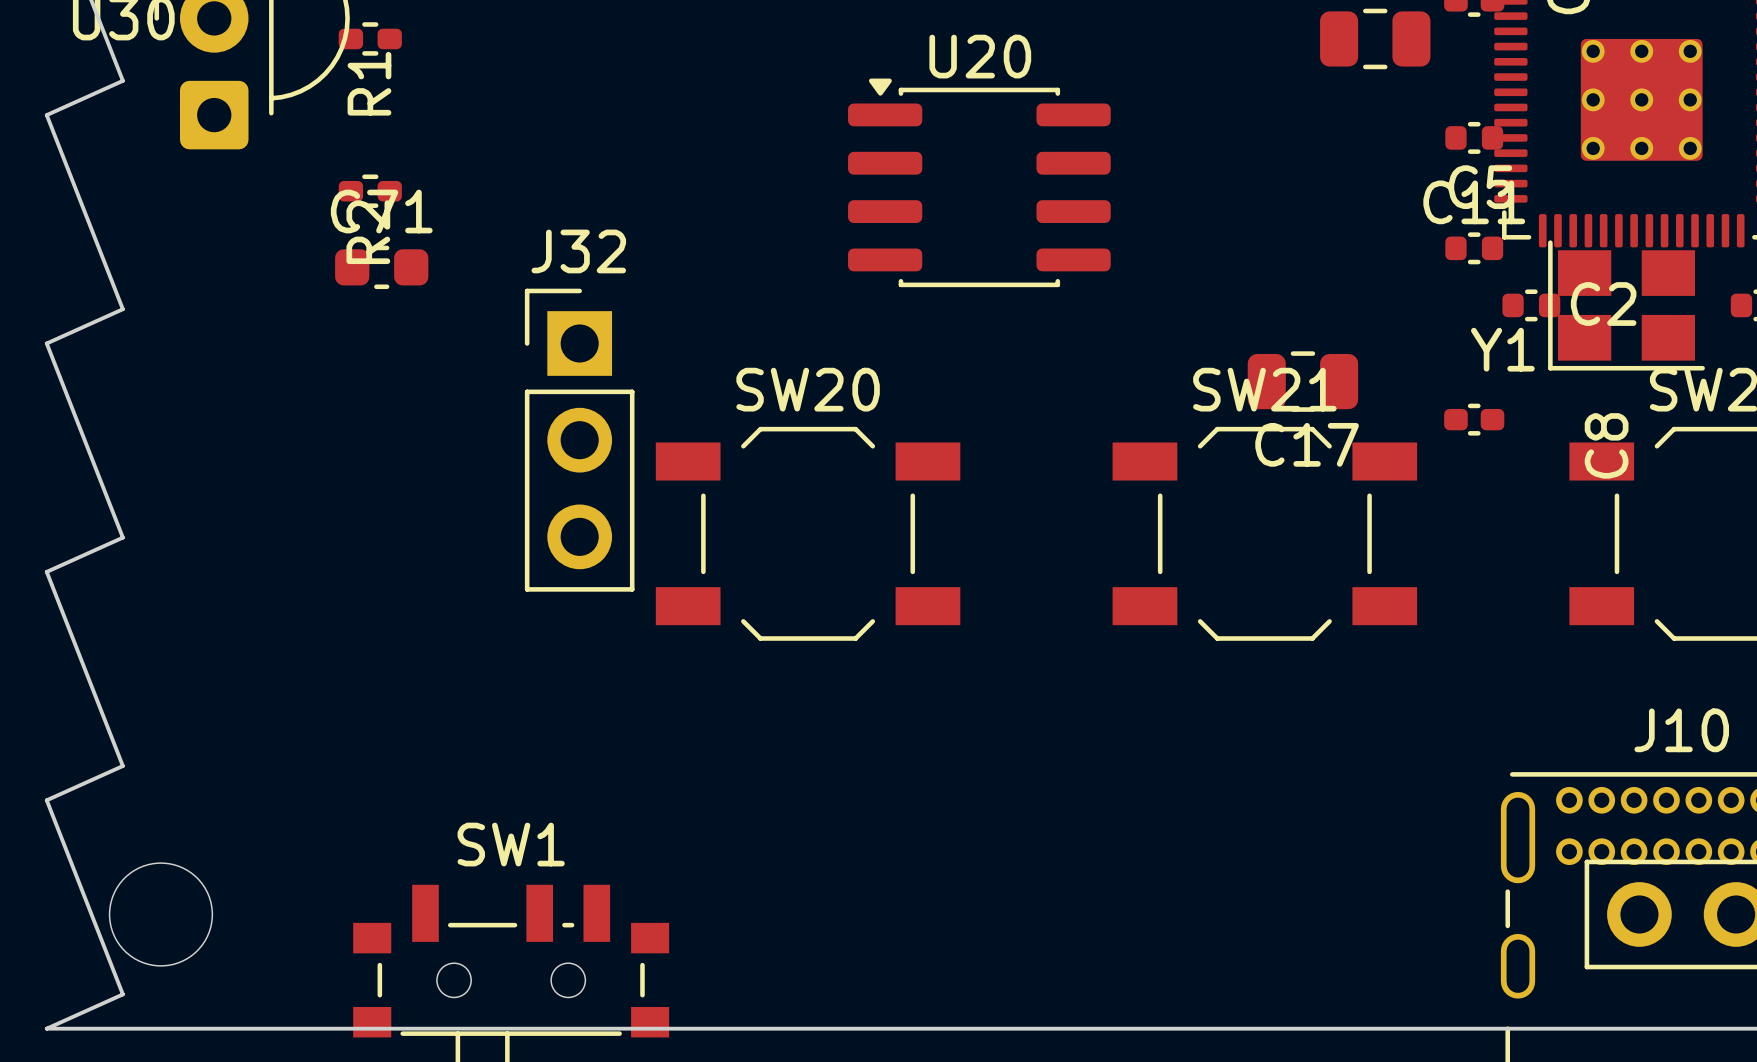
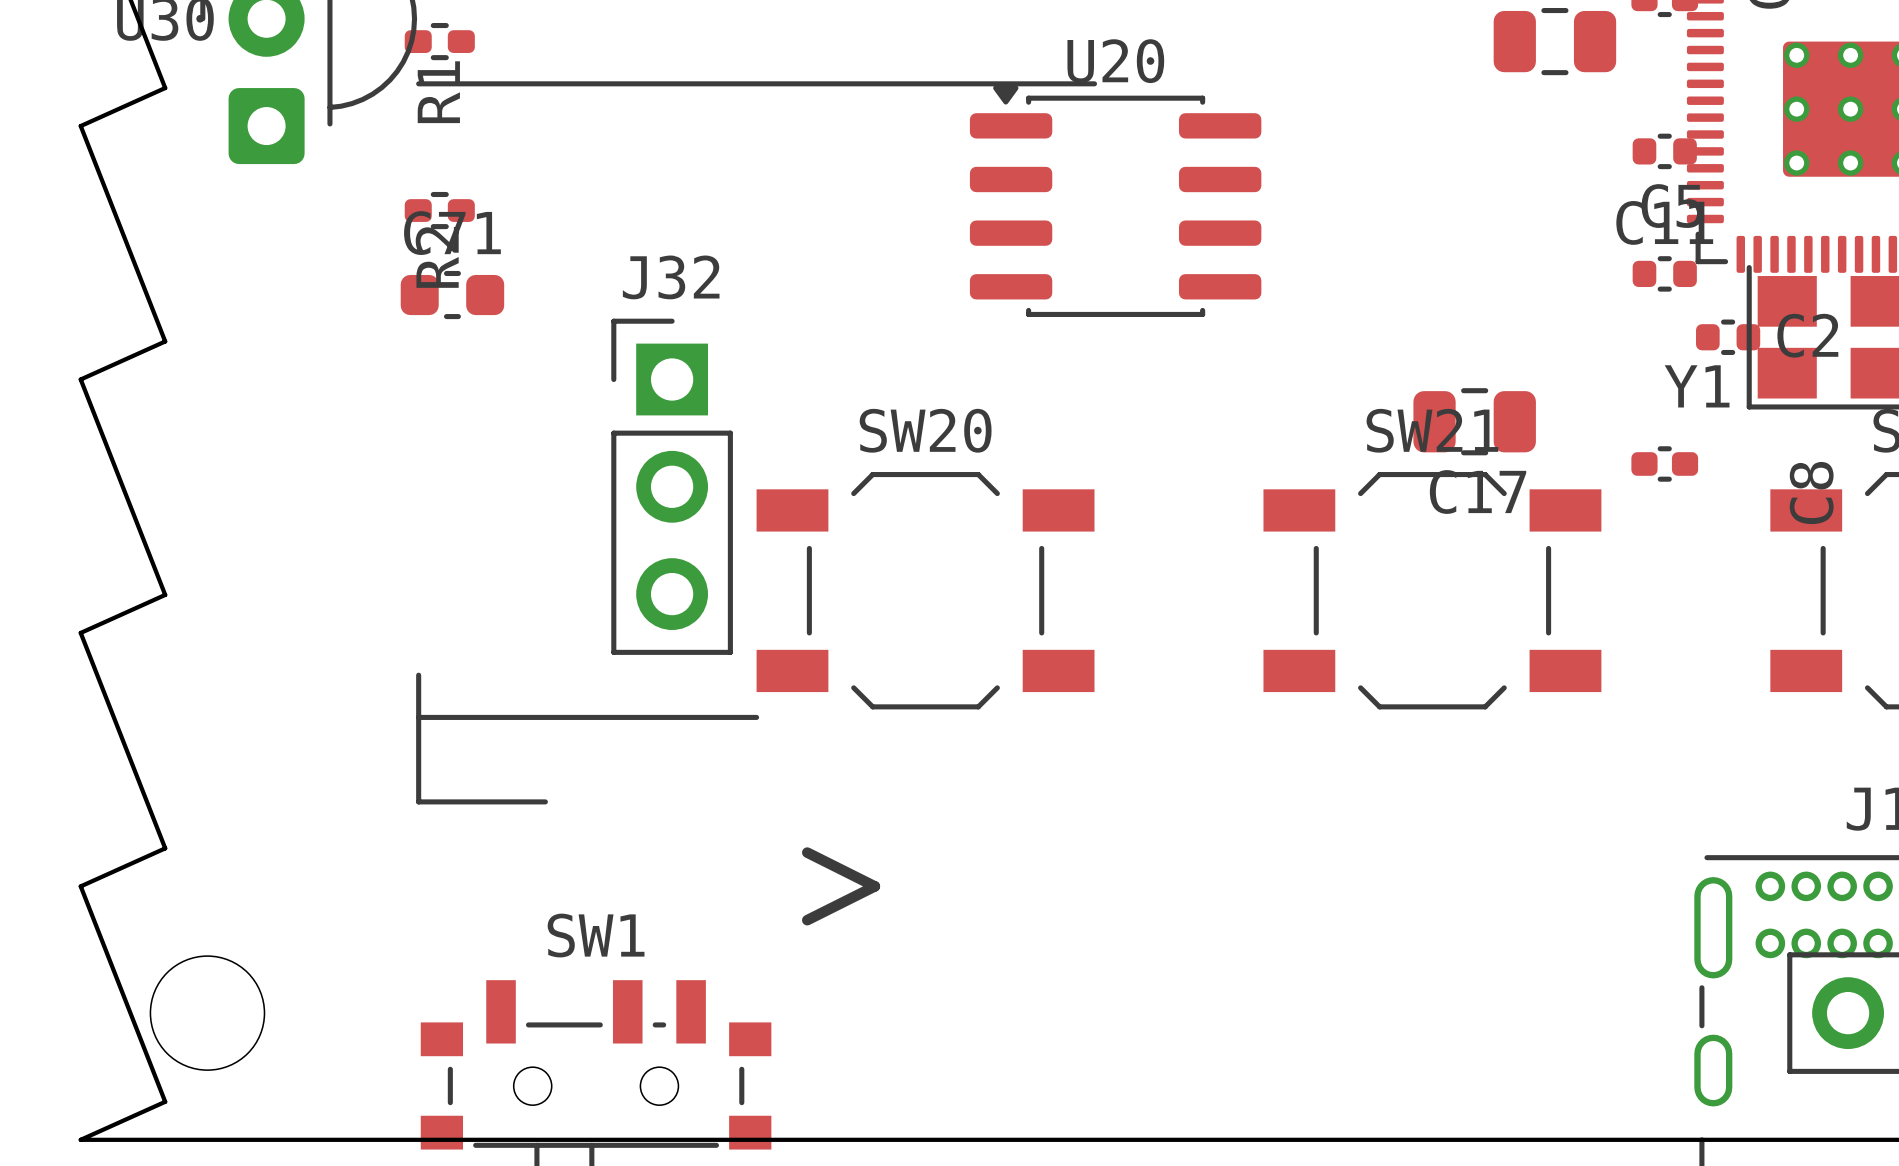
line: none -> (418, 83) (1094, 83)
line: none -> (418, 675) (418, 801) (545, 801)
line: none -> (418, 717) (756, 717)
line: none -> (807, 852) (874, 886) (807, 920)

